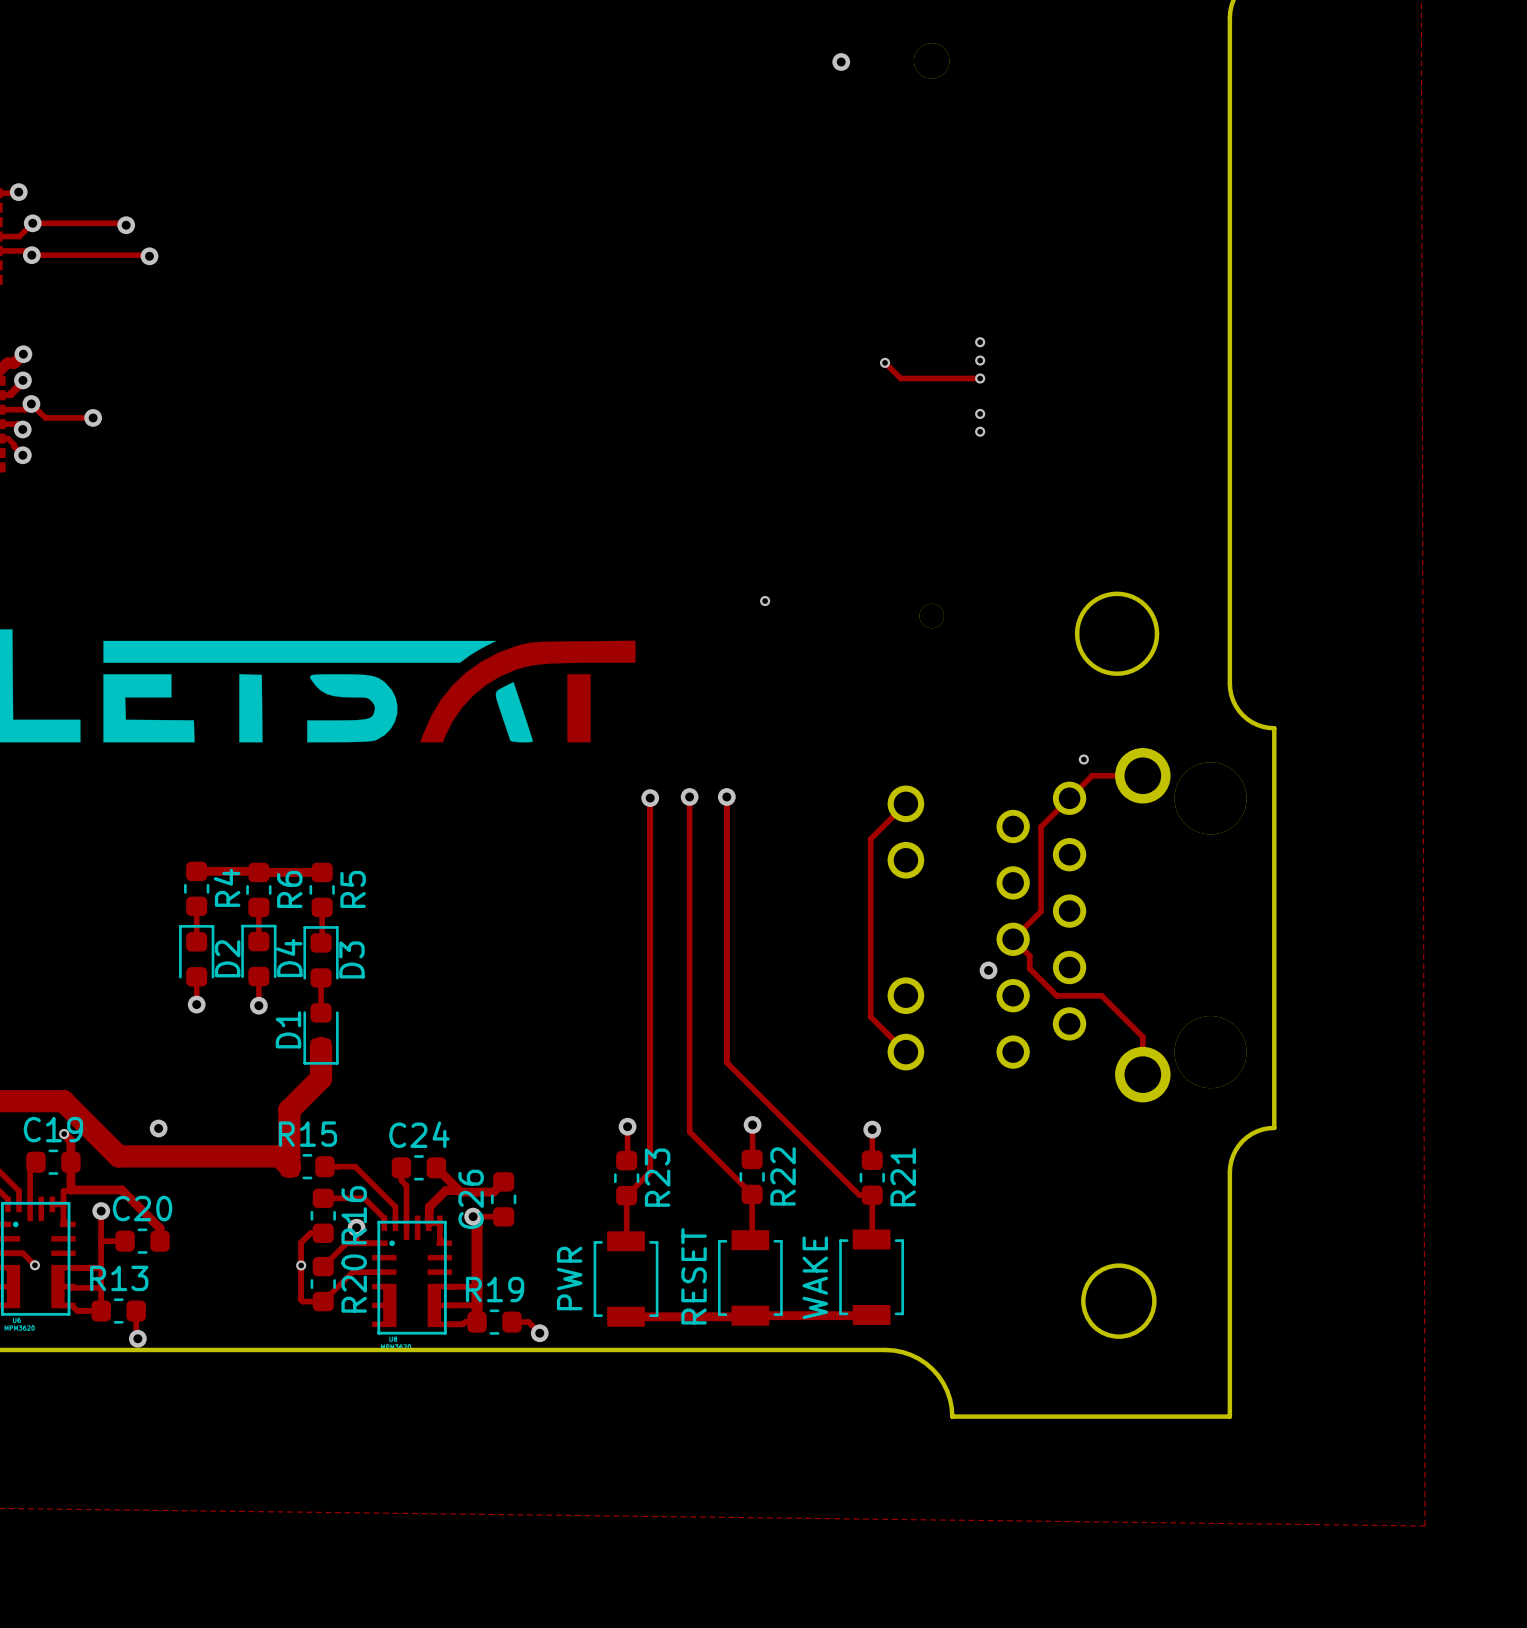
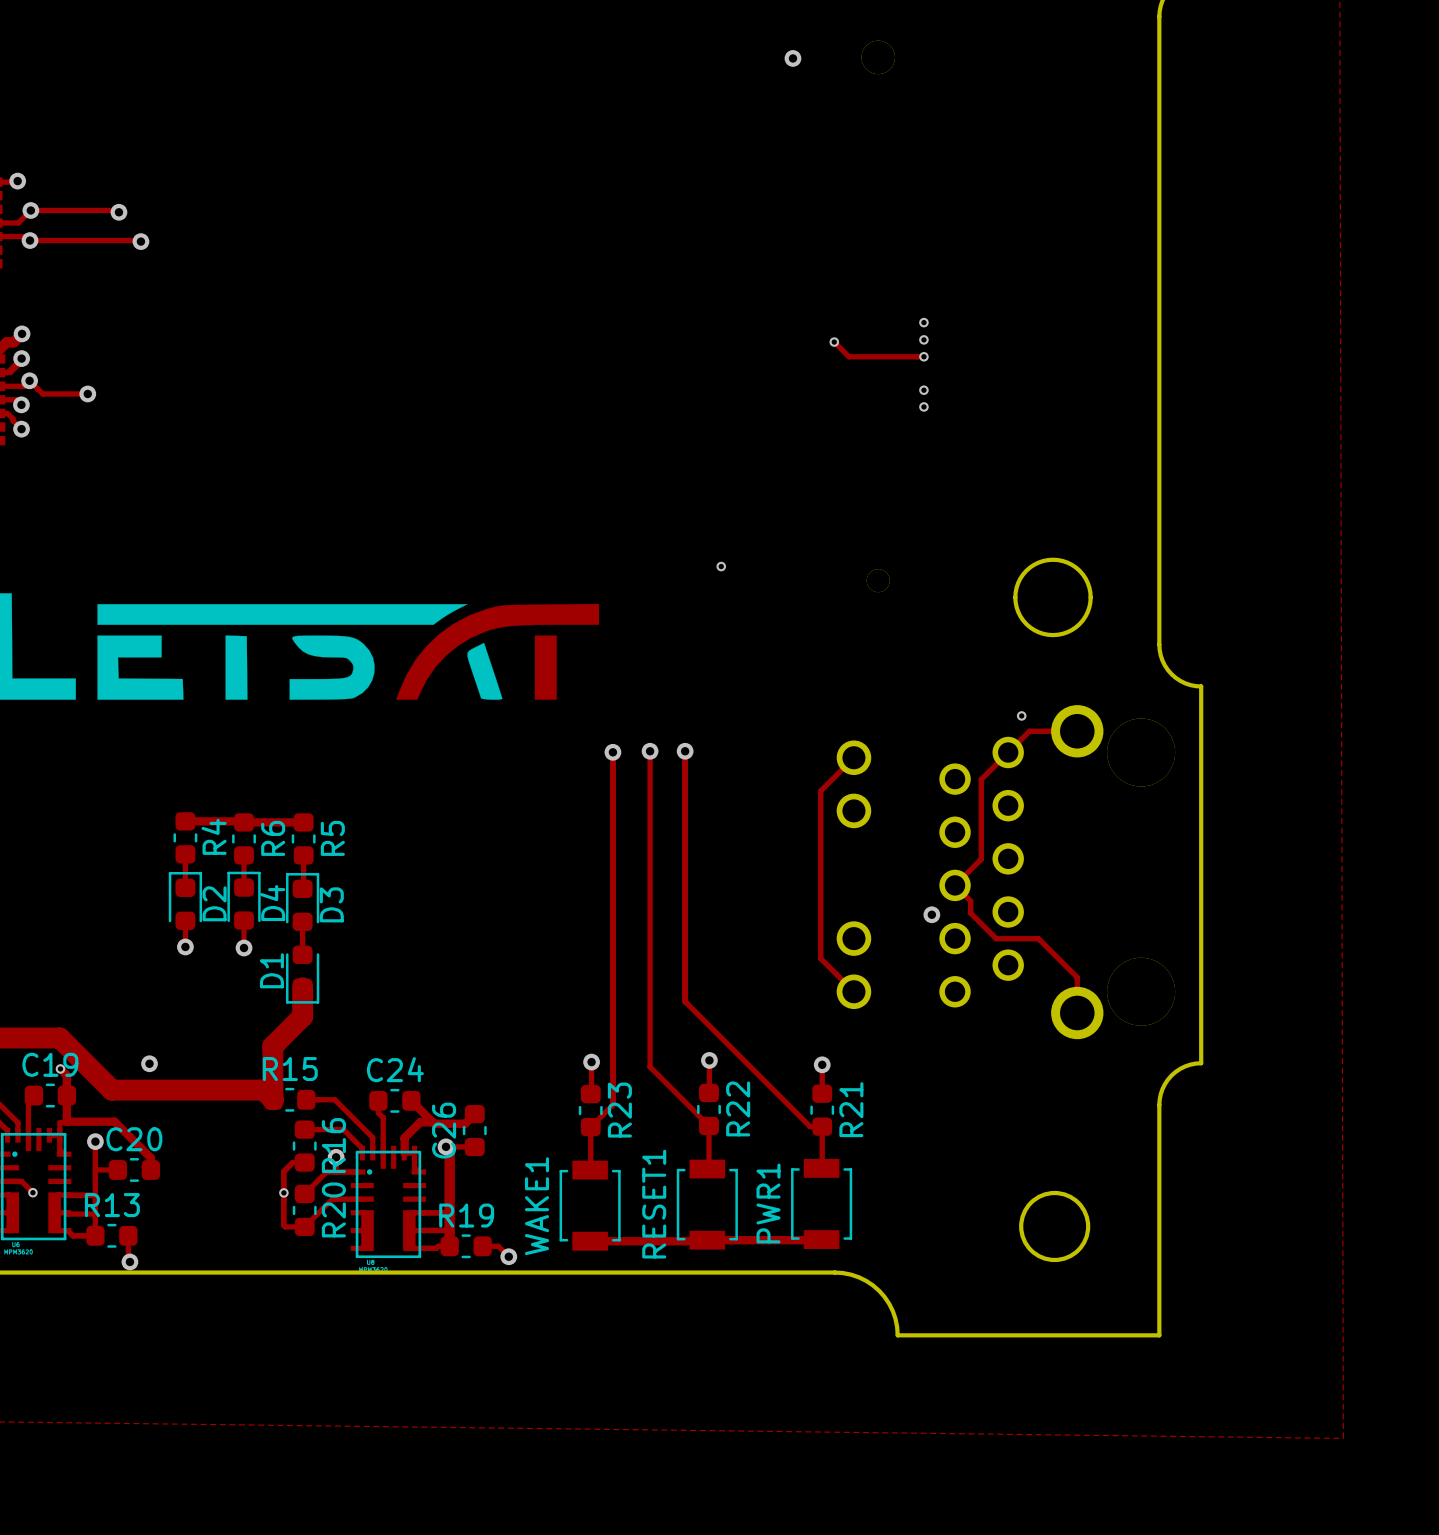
RESET name: RESET (694, 1276) -> RESET1 (654, 1204)
WAKE name: WAKE (815, 1277) -> PWR1 (768, 1203)
PWR name: PWR (569, 1278) -> WAKE1 (537, 1206)

